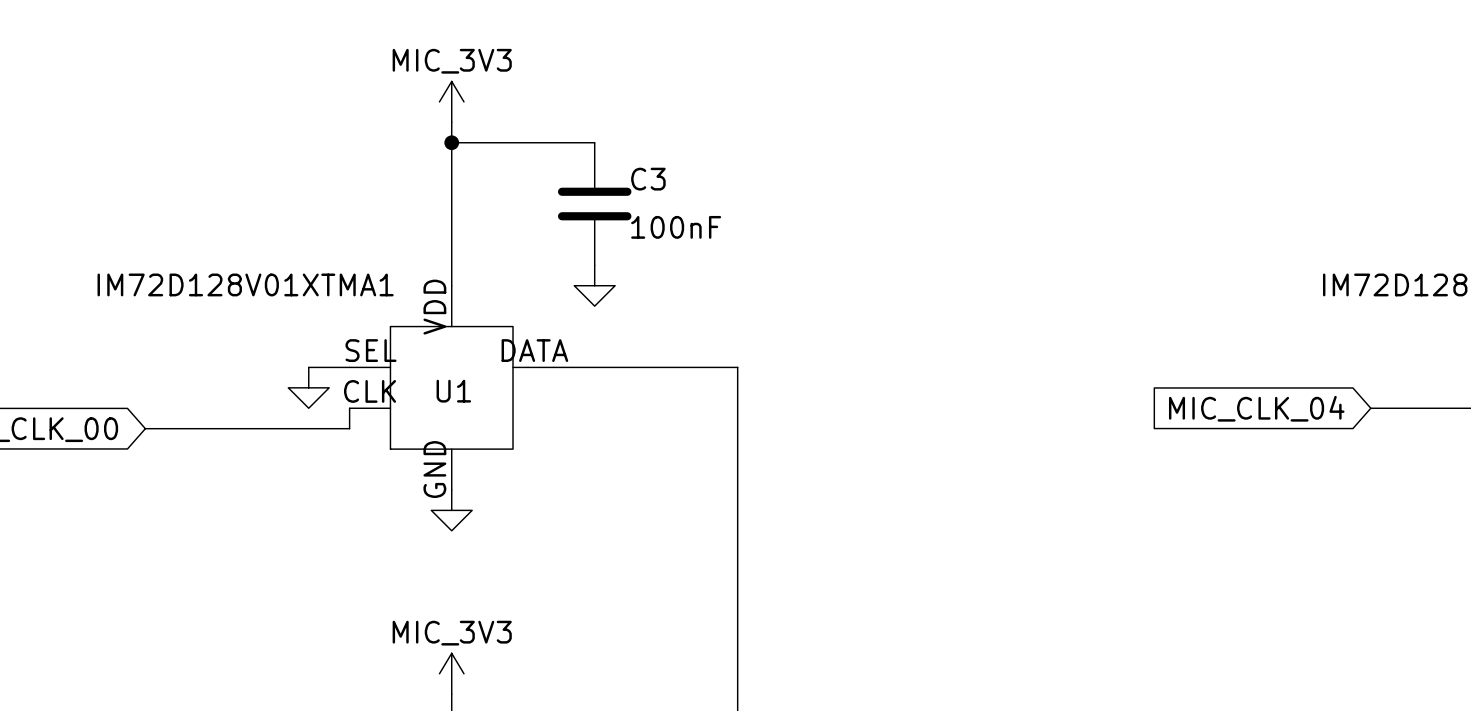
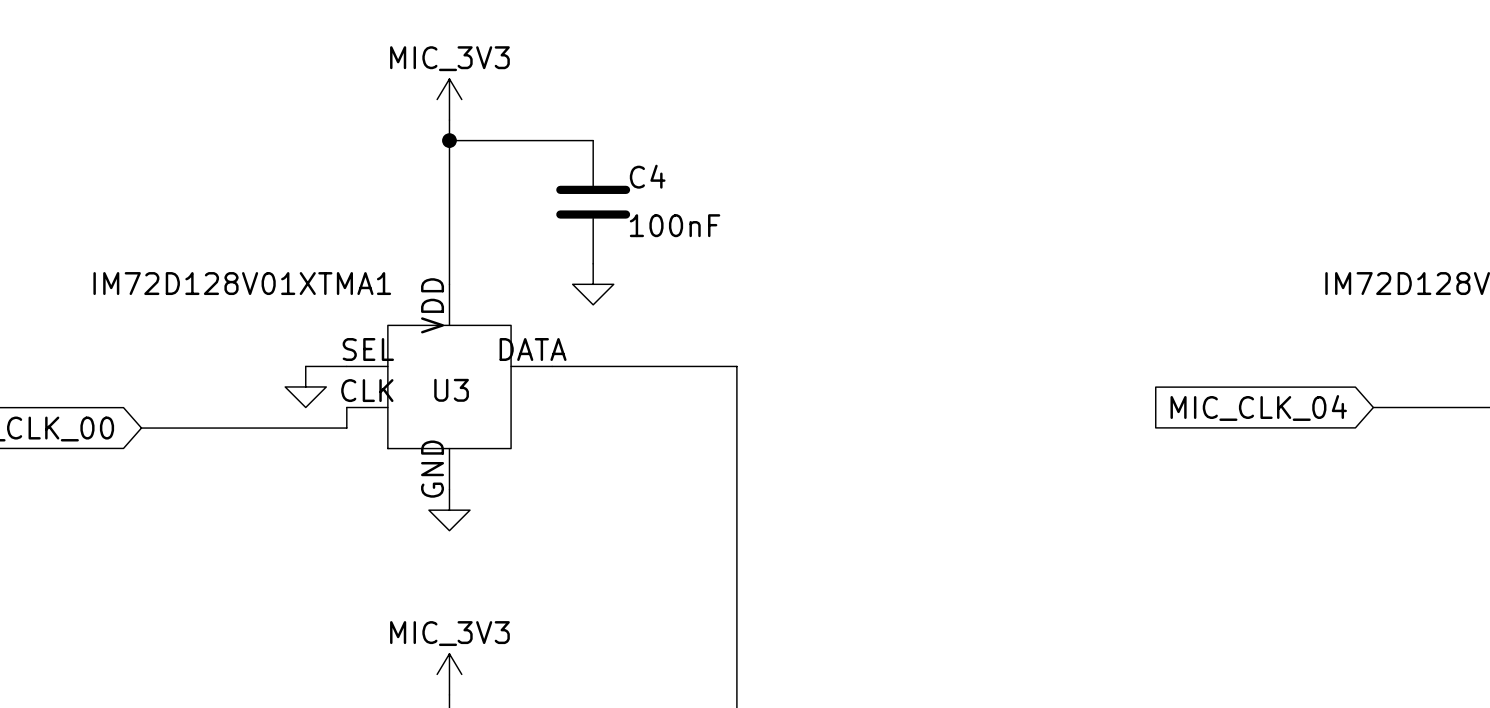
C3 name: C3 (648, 179) -> C4 (647, 176)
U1 name: U1 (453, 391) -> U3 (451, 390)

